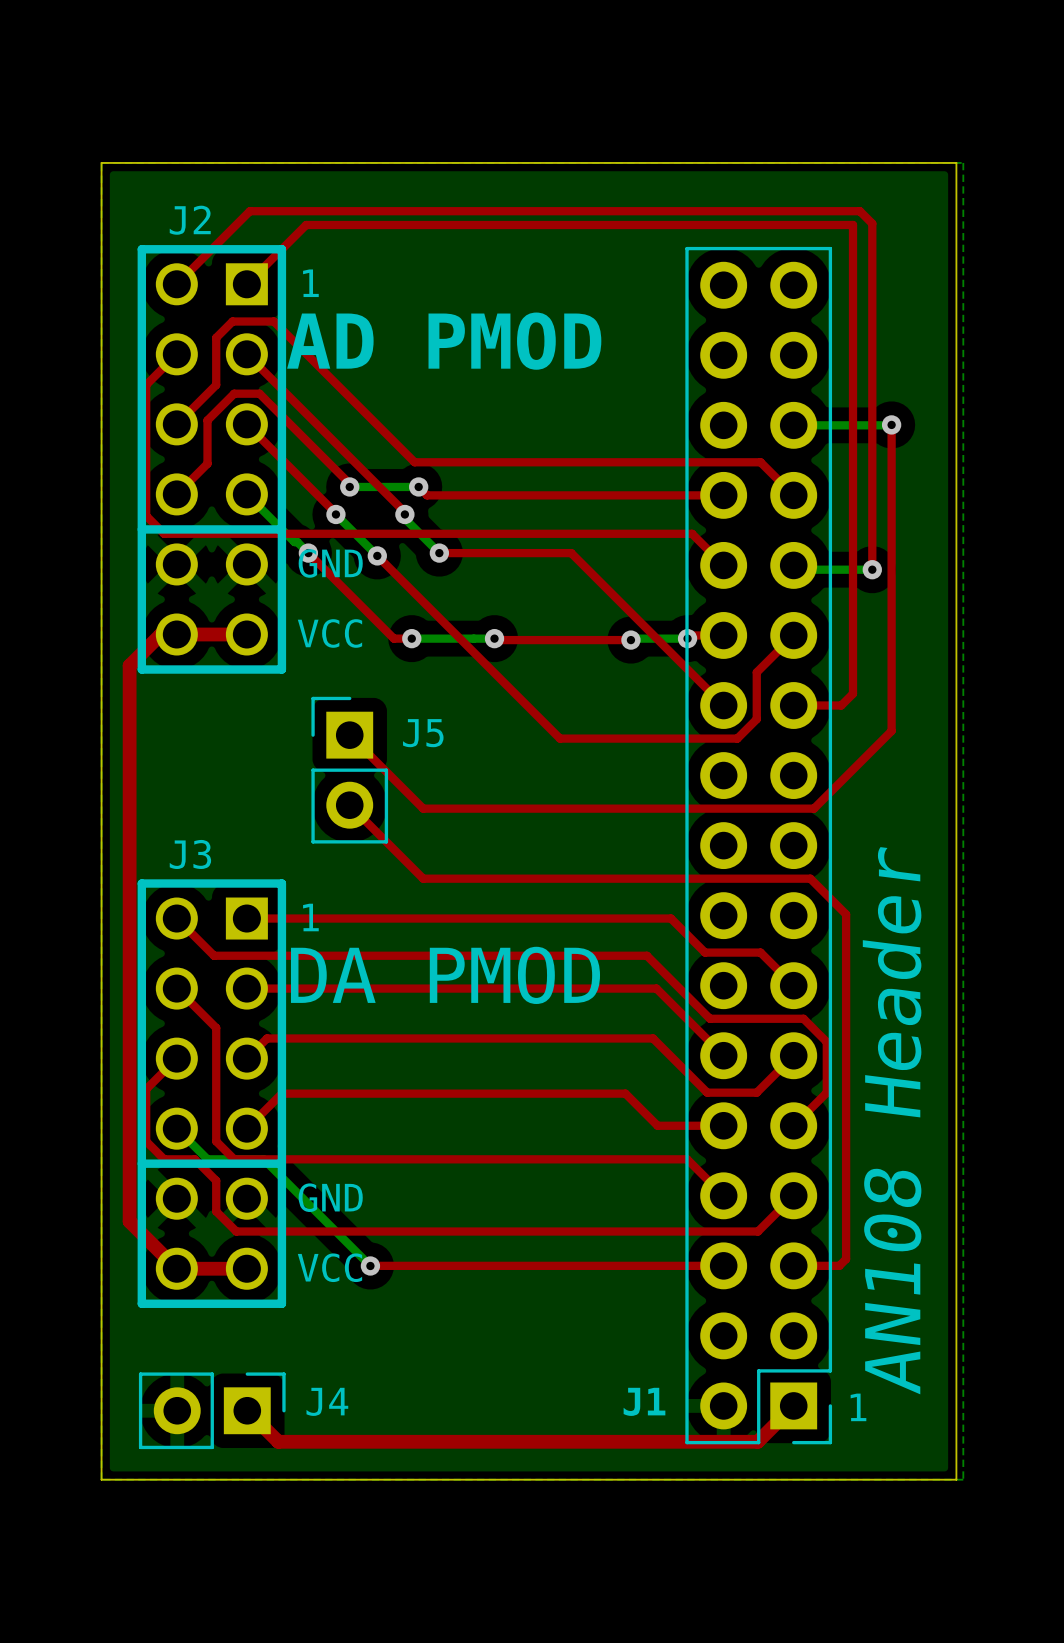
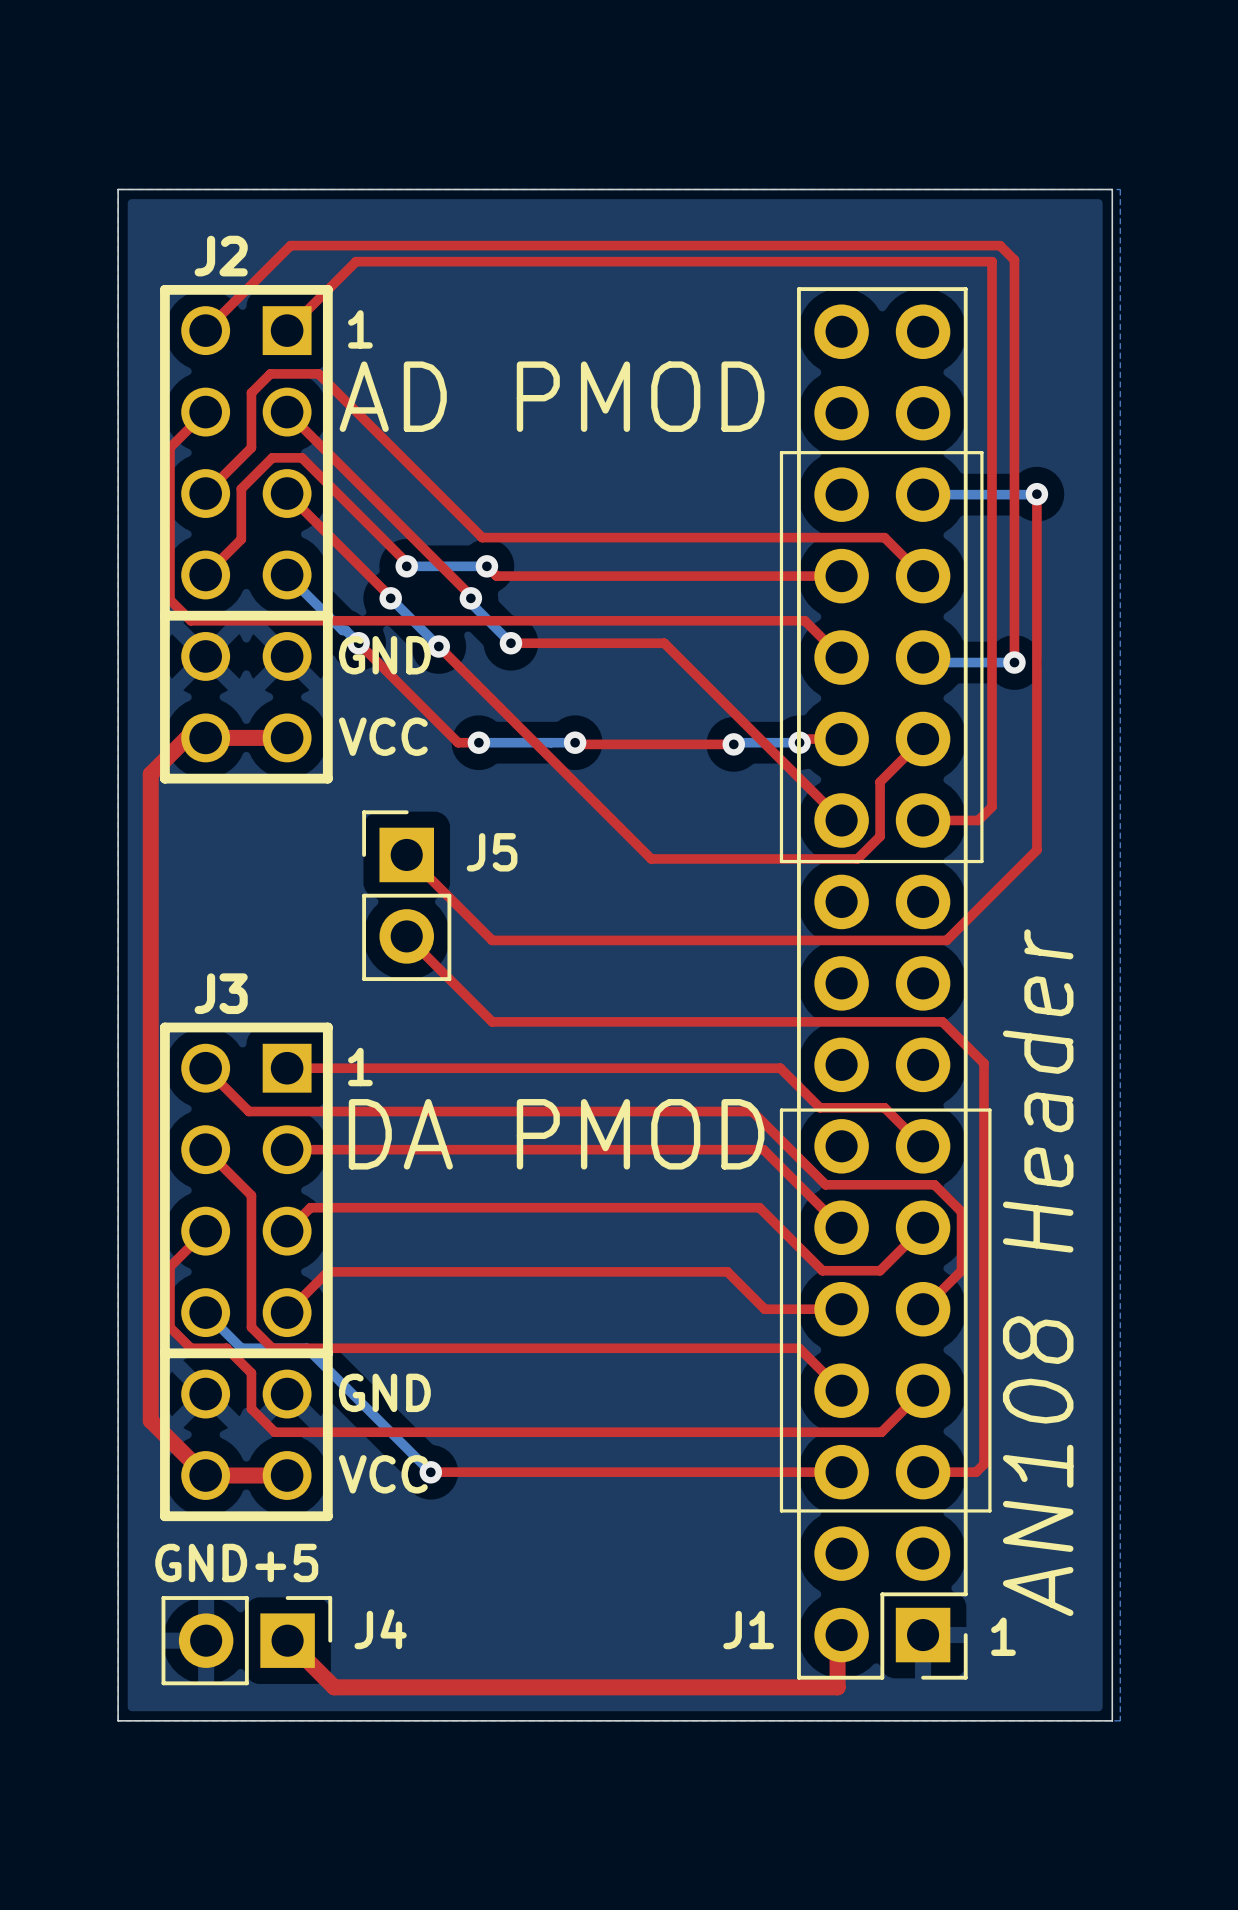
line: none -> (781, 452) (781, 861) (981, 861) (981, 452) (781, 452)
line: none -> (781, 1110) (989, 1110) (989, 1510) (781, 1510) (781, 1110)
text: none -> GND (201, 1562)
text: none -> +5 (286, 1562)
top track: (793, 1405) (757, 1441) (278, 1441) -> (841, 1635) (837, 1639) (837, 1687) (334, 1687) (323, 1676)

